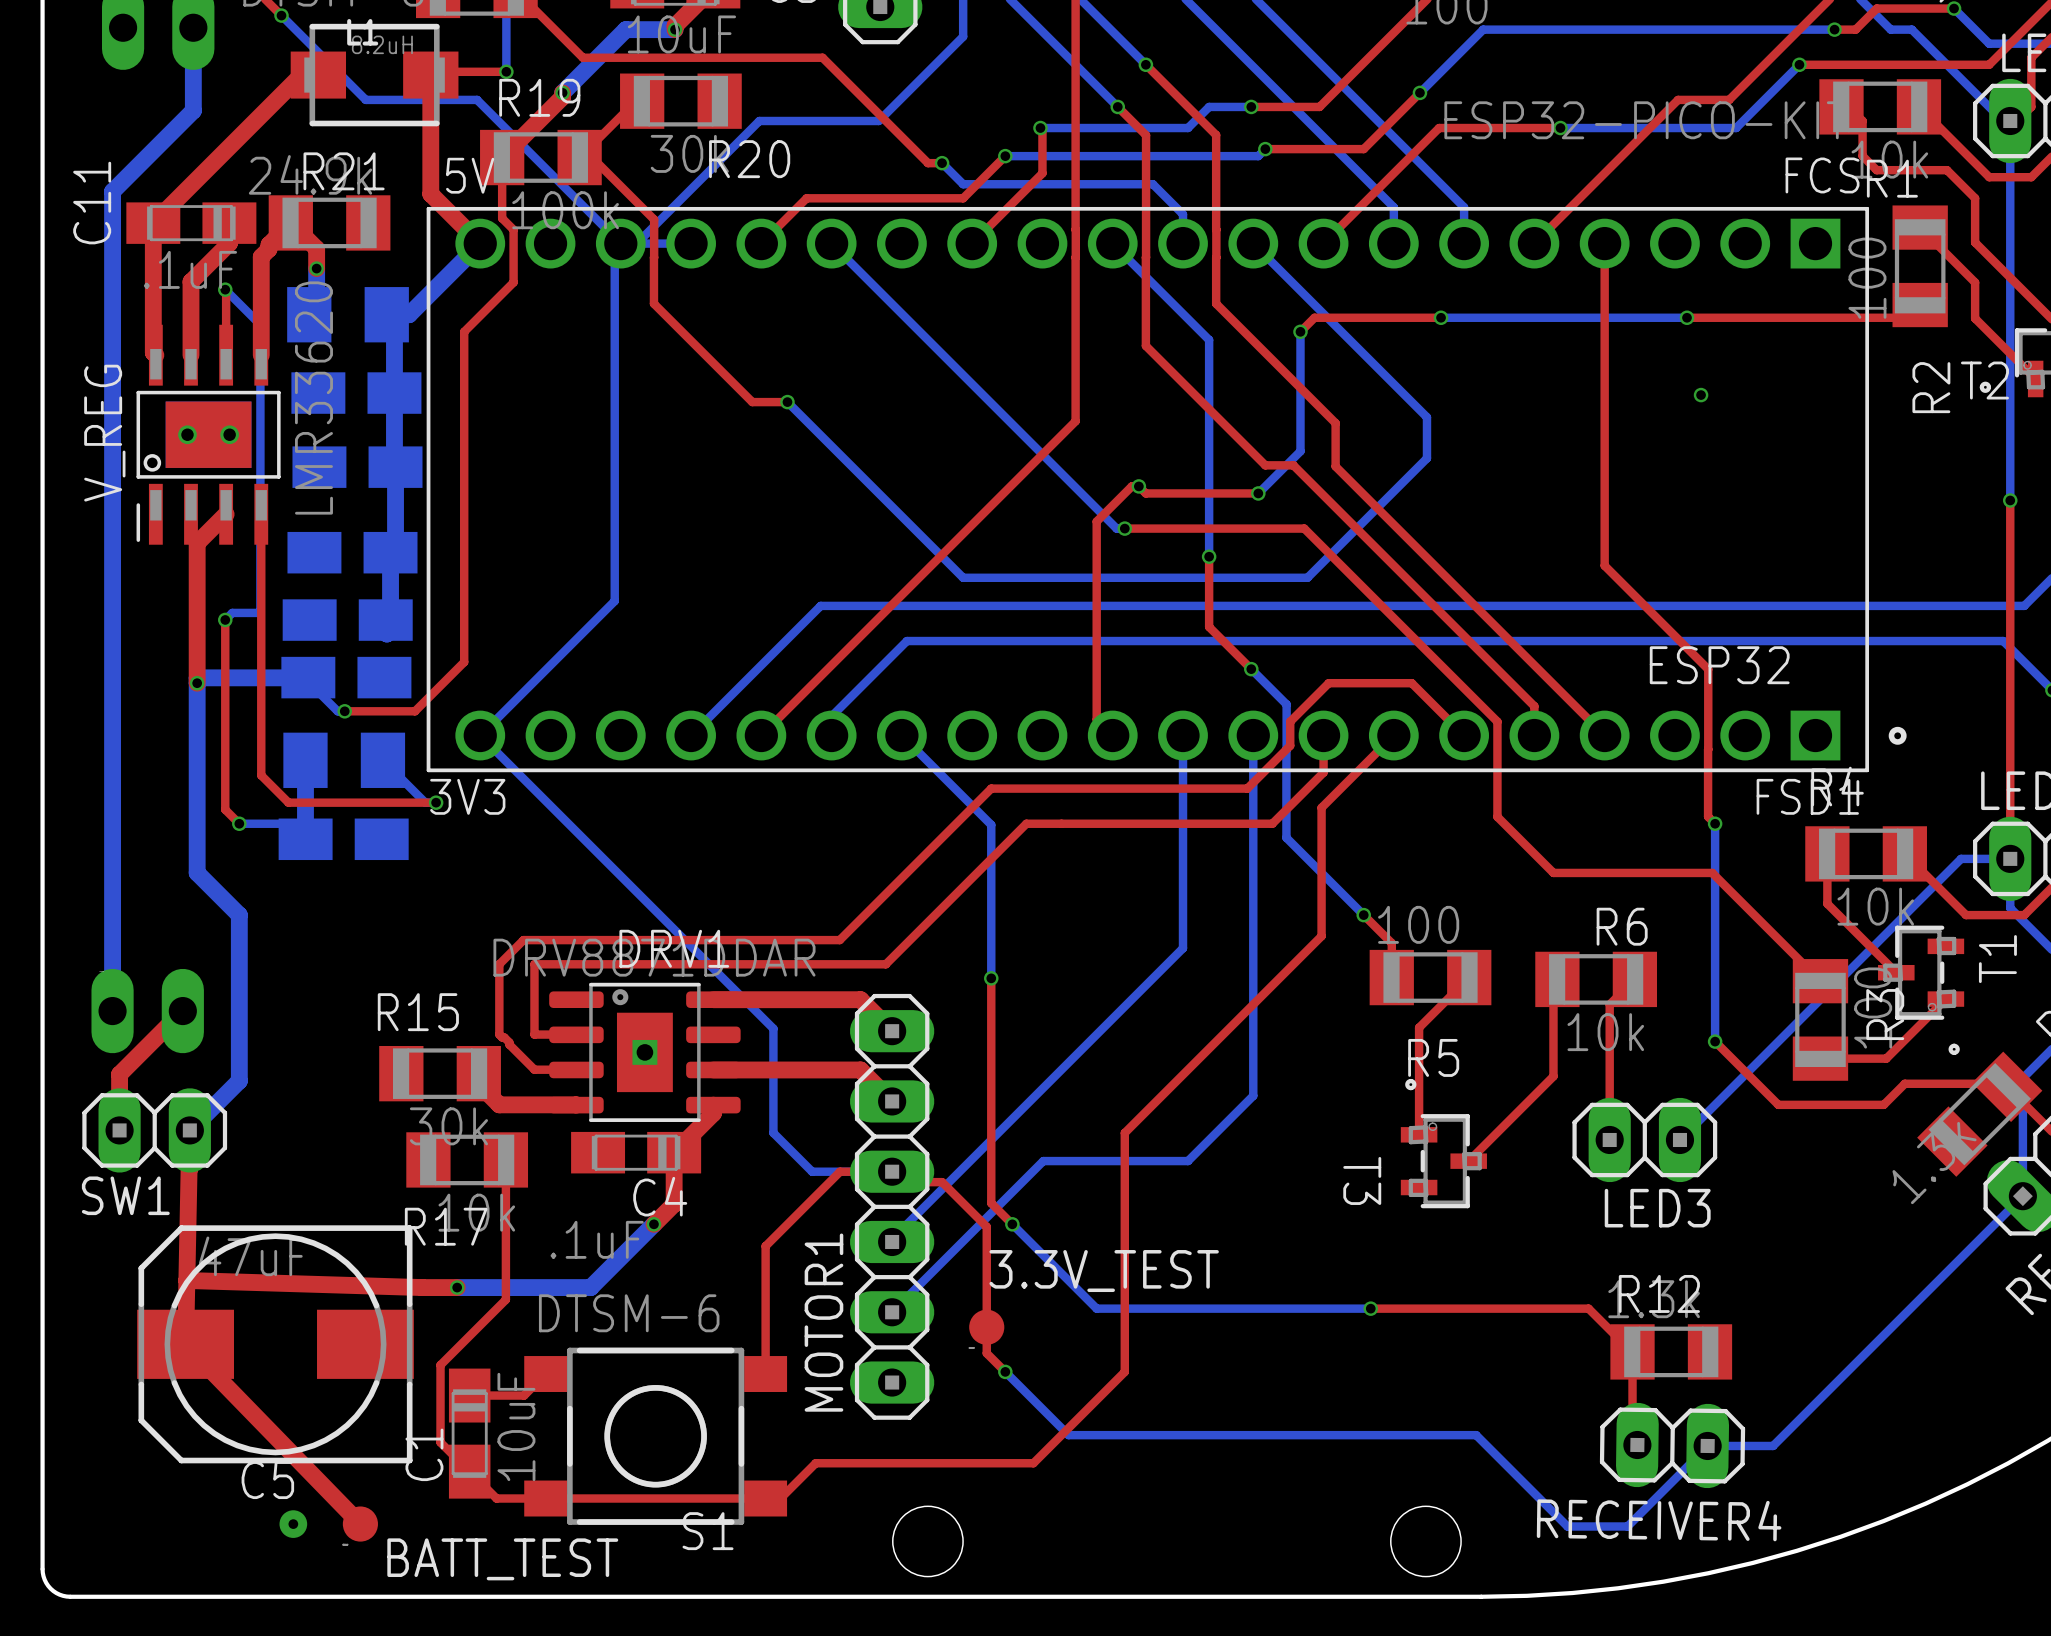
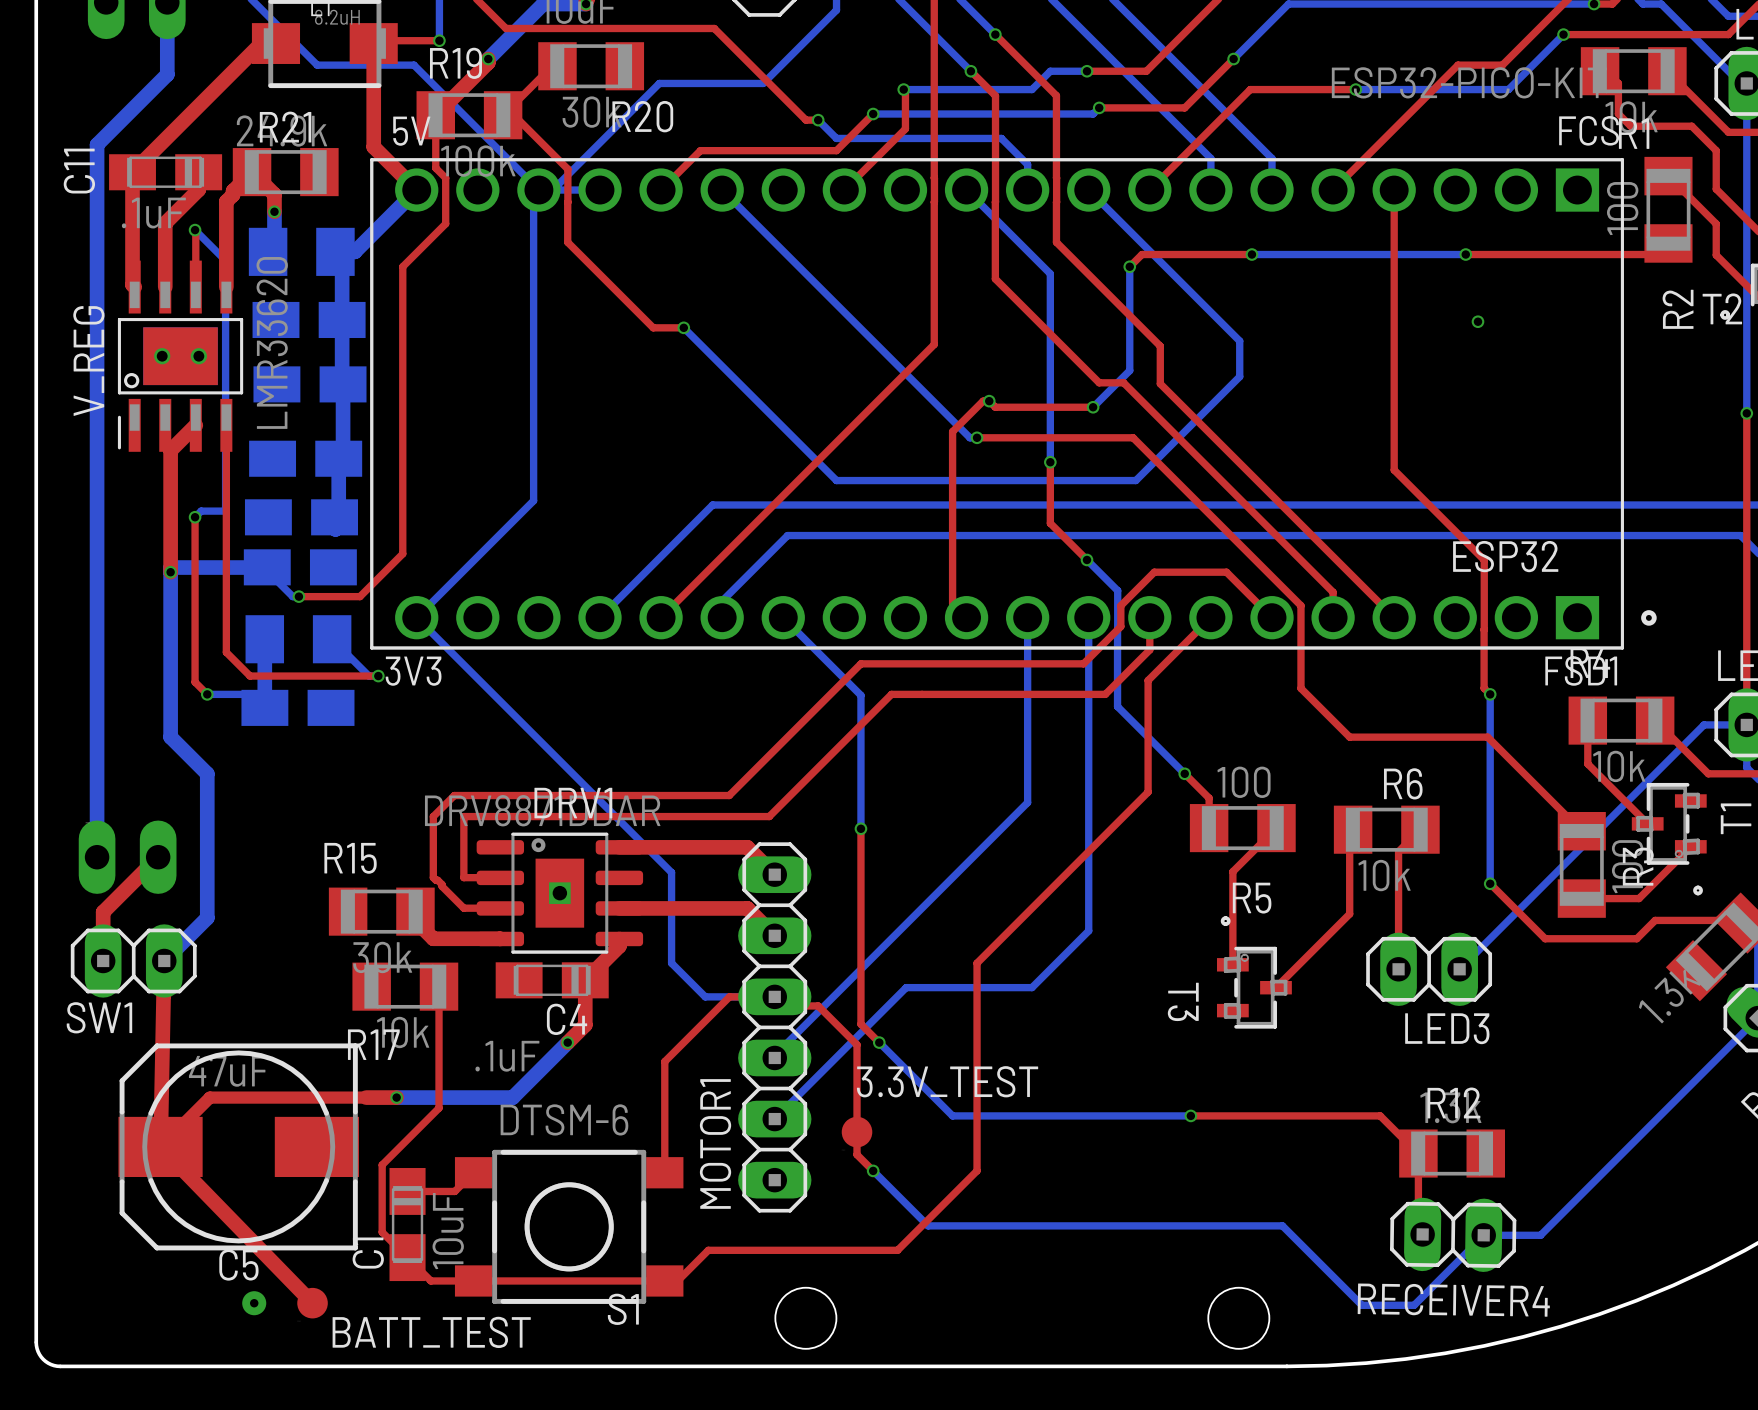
top track: (186, 1280) (422, 1287) -> (160, 1146) (209, 1097) (366, 1097)

